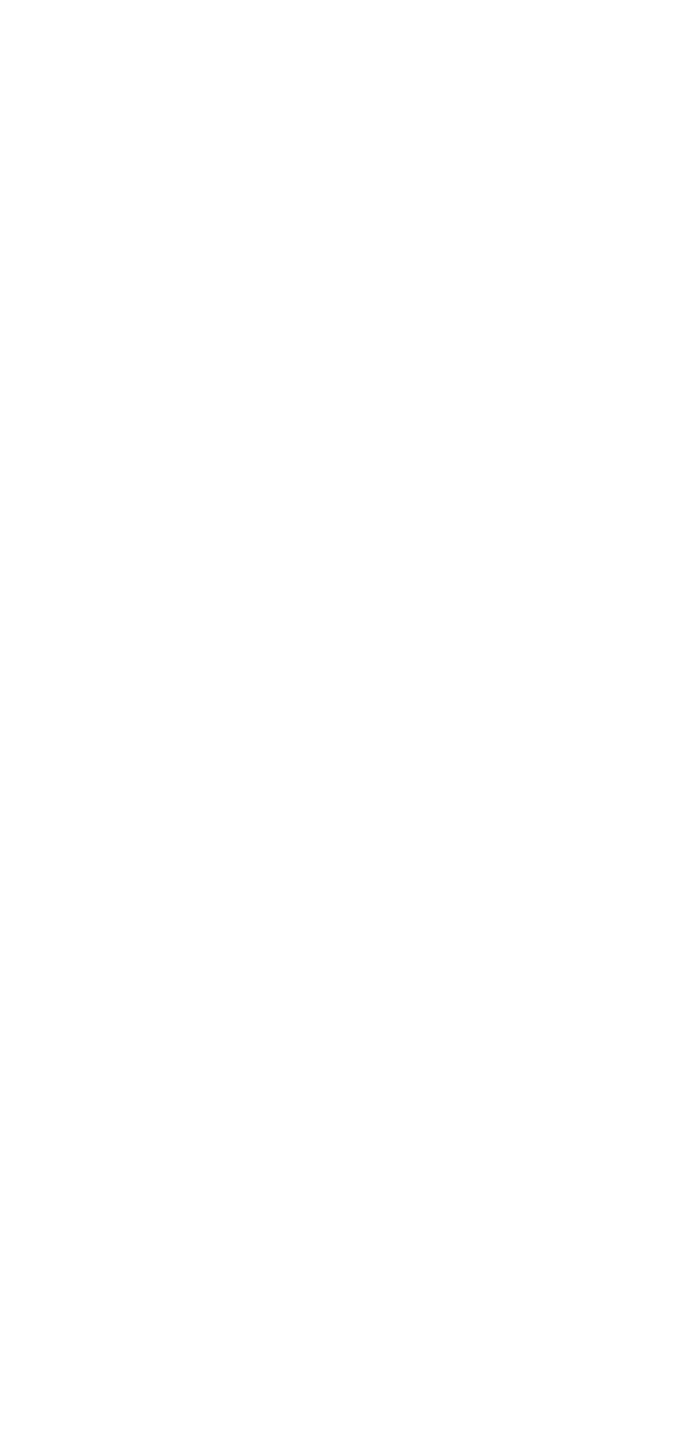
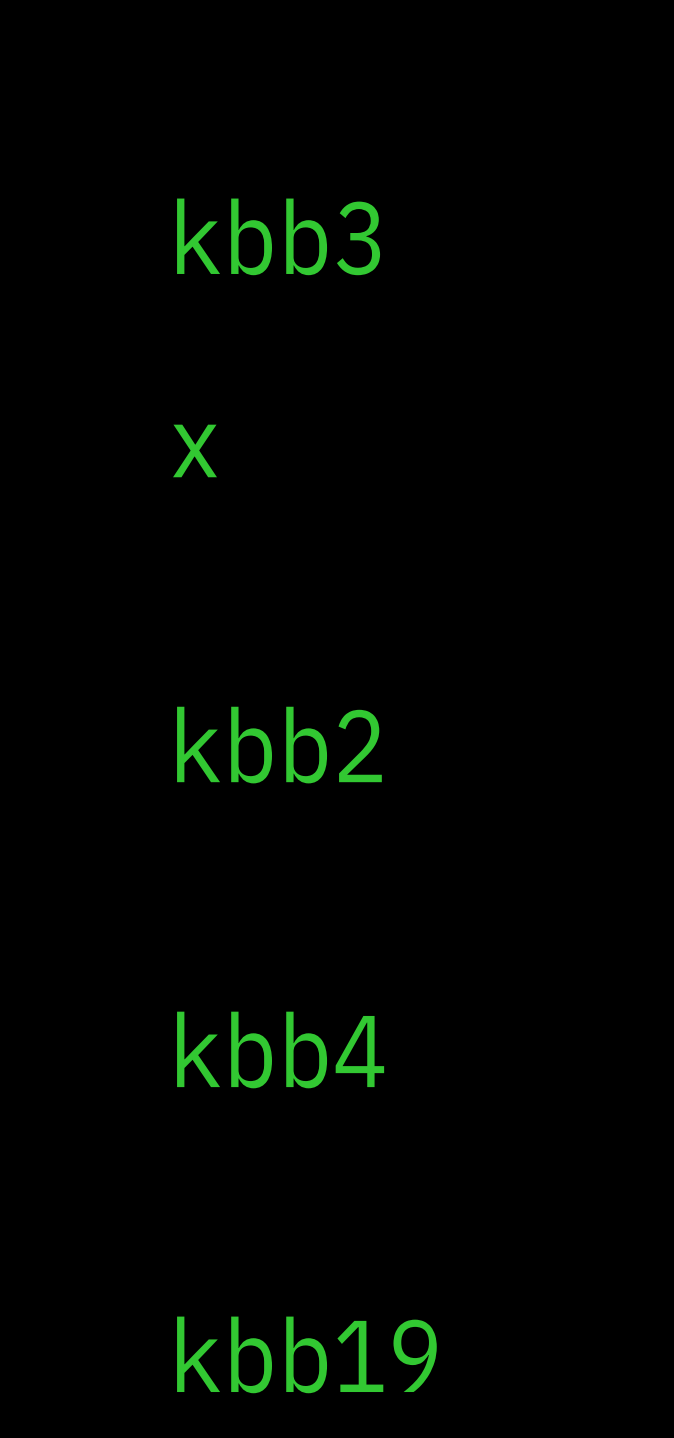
text: none -> kbb3 (278, 236)
text: none -> x (194, 450)
text: none -> kbb2 (279, 745)
text: none -> kbb4 (280, 1049)
text: none -> kbb19 (306, 1354)

